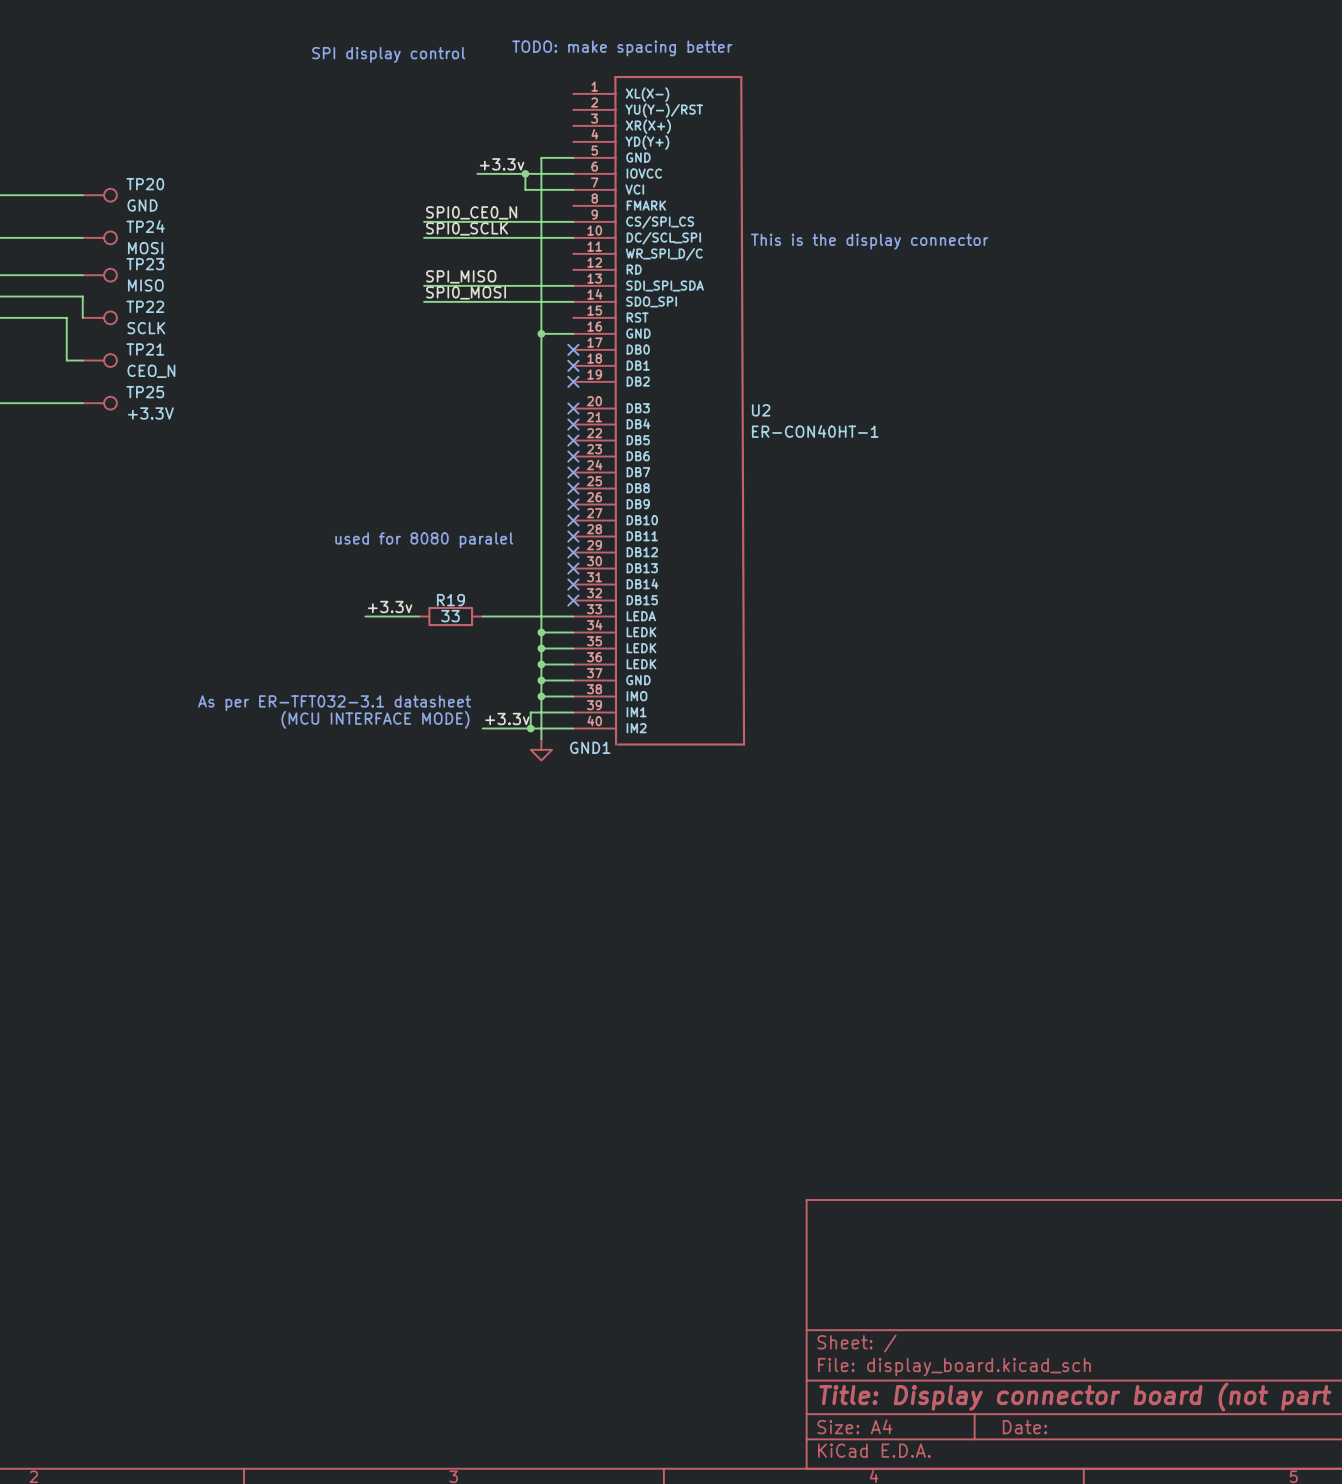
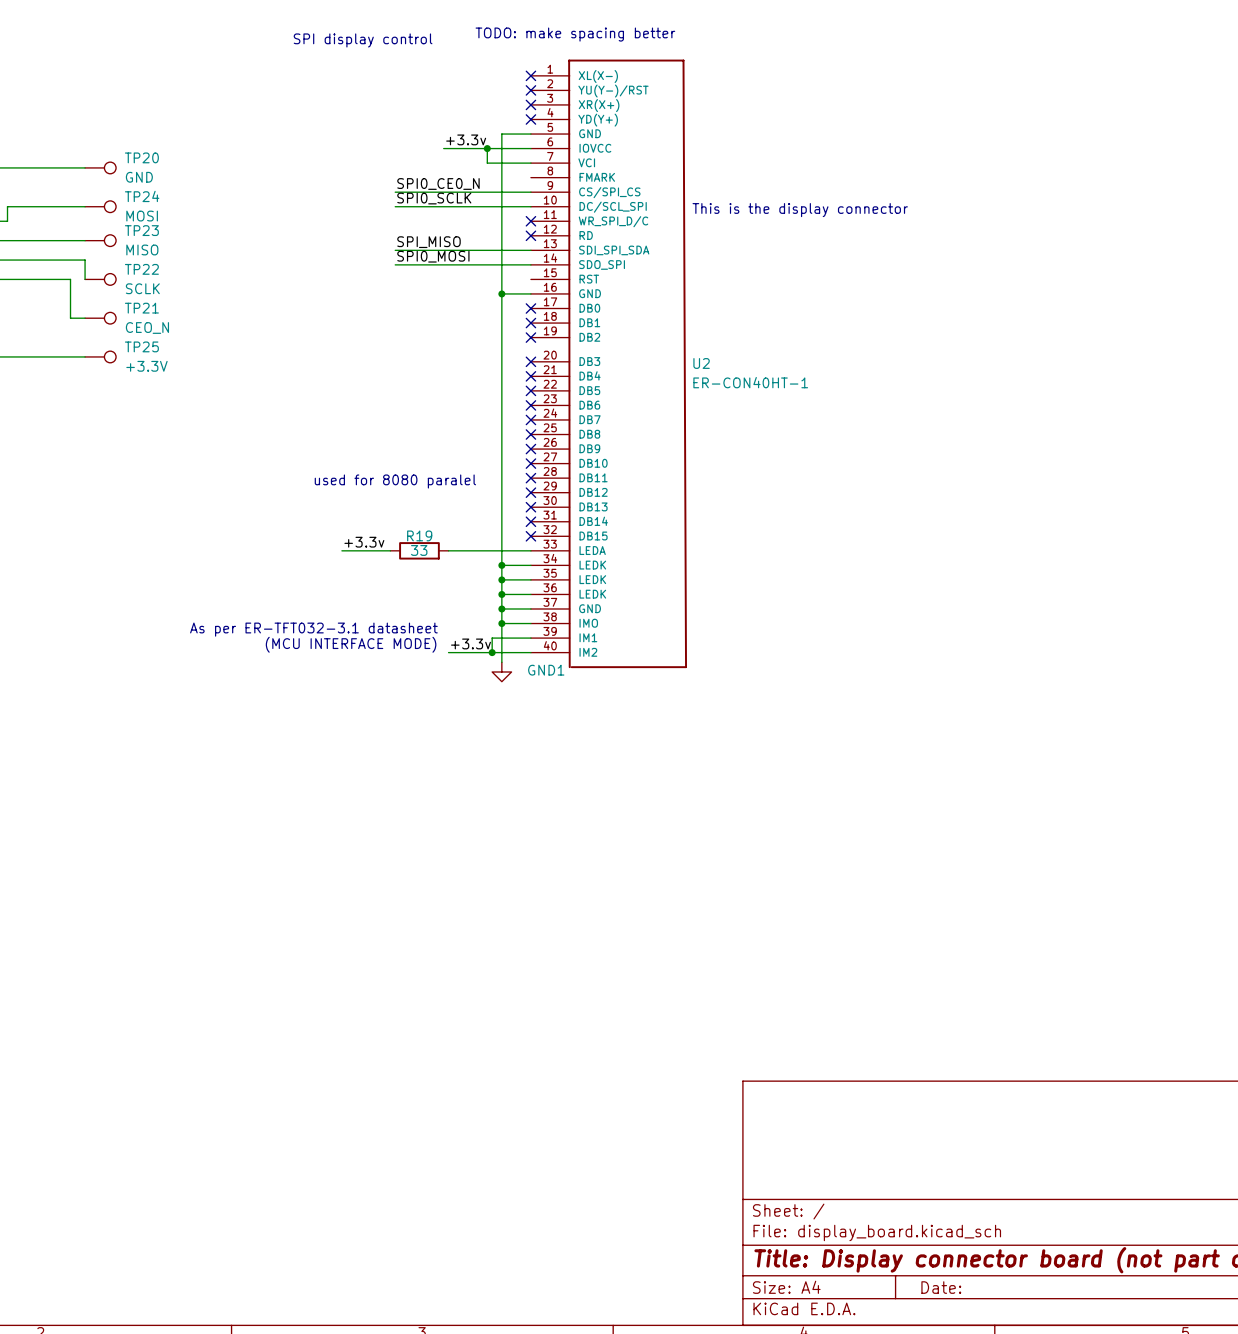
no-connect mark: none -> (530, 75)
no-connect mark: none -> (530, 90)
no-connect mark: none -> (530, 104)
no-connect mark: none -> (530, 119)
no-connect mark: none -> (530, 221)
no-connect mark: none -> (530, 235)

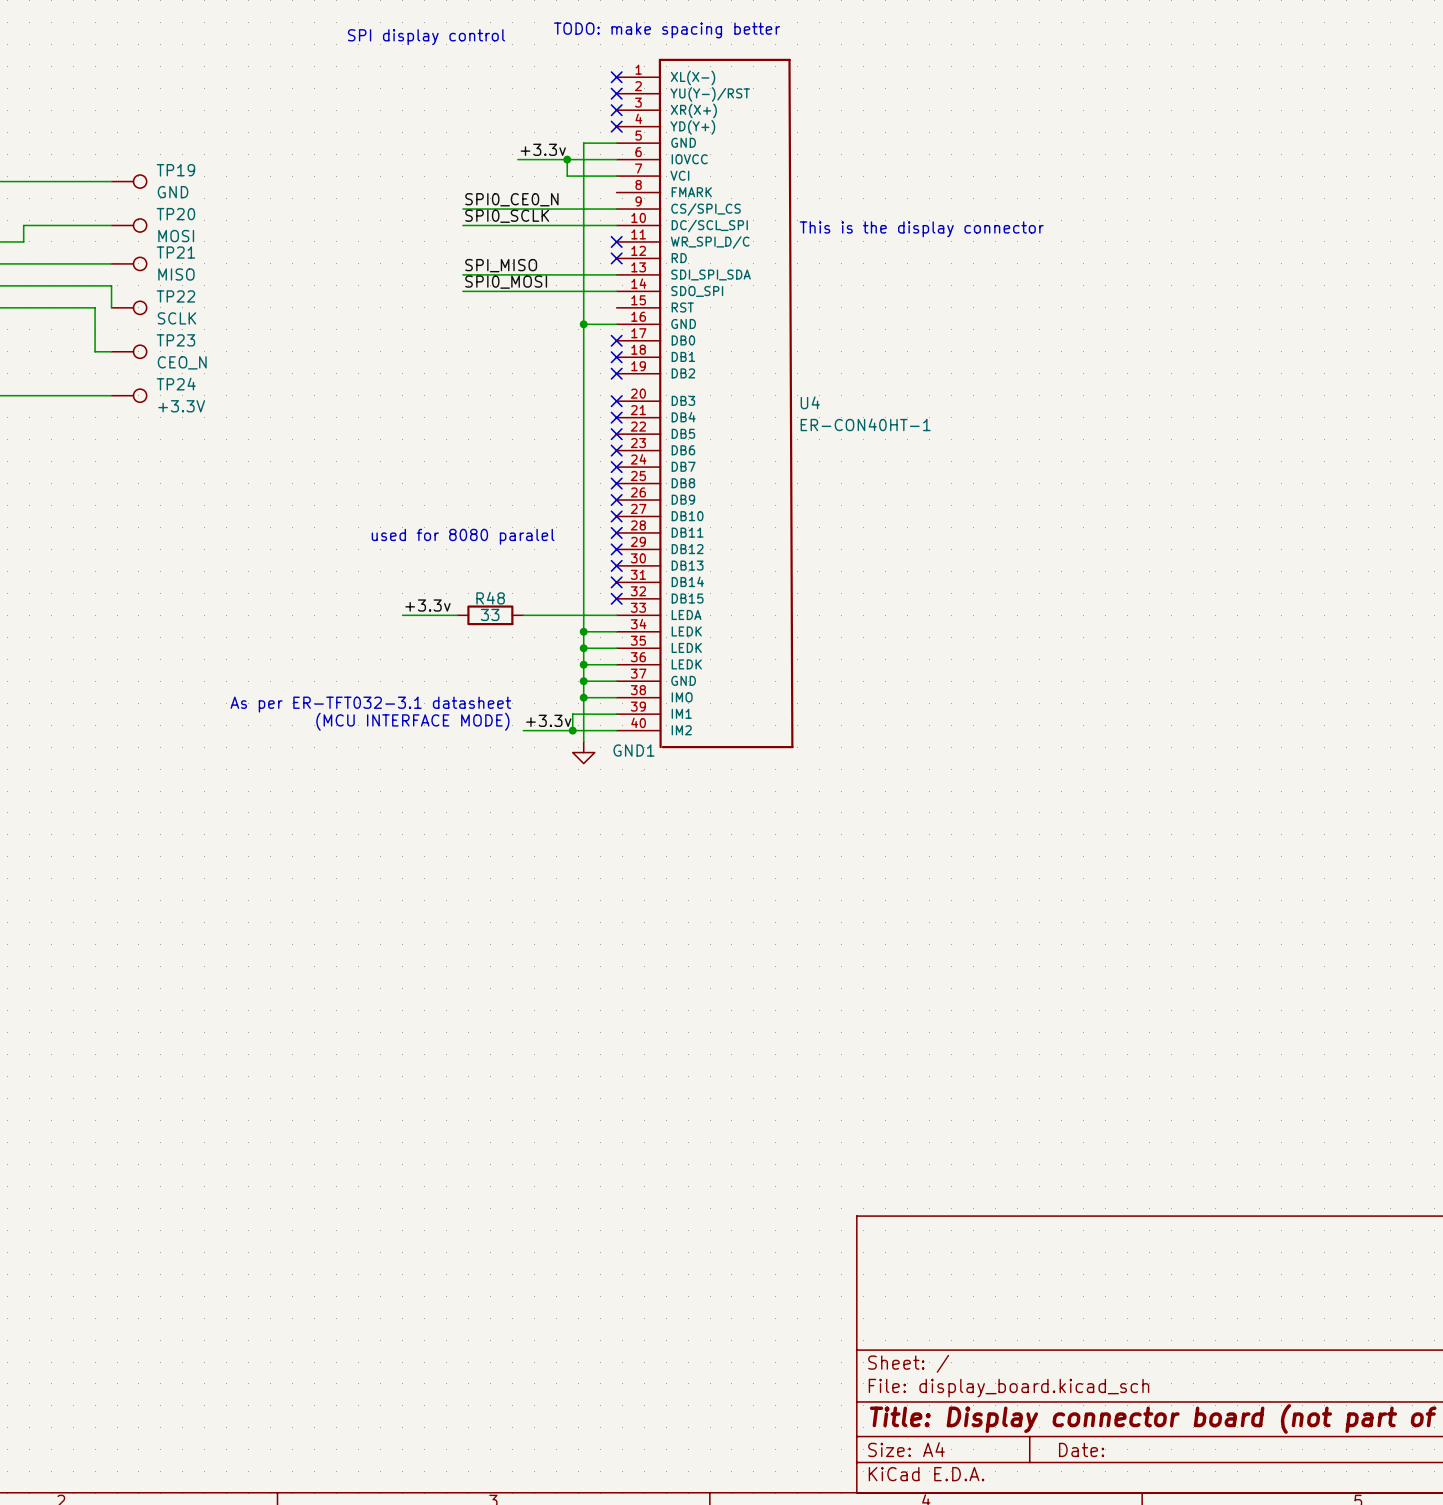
TP20 name: TP20 (141, 157) -> TP19 (175, 170)
TP24 name: TP24 (142, 196) -> TP20 (175, 214)
TP23 name: TP23 (141, 230) -> TP21 (175, 252)
TP21 name: TP21 (141, 308) -> TP23 (175, 340)
TP25 name: TP25 (141, 346) -> TP24 (176, 384)
U2 name: U2 (701, 363) -> U4 (810, 402)
R19 name: R19 (419, 535) -> R48 (490, 598)

